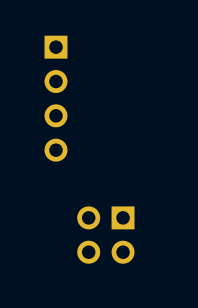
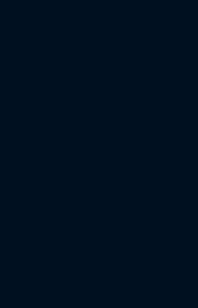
part: (55, 98) -> none
part: (105, 235) -> none

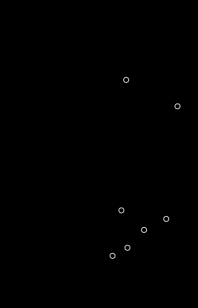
via: none -> (126, 79)
via: none -> (177, 106)
via: none -> (121, 210)
via: none -> (166, 218)
via: none -> (144, 229)
via: none -> (127, 247)
via: none -> (112, 255)

